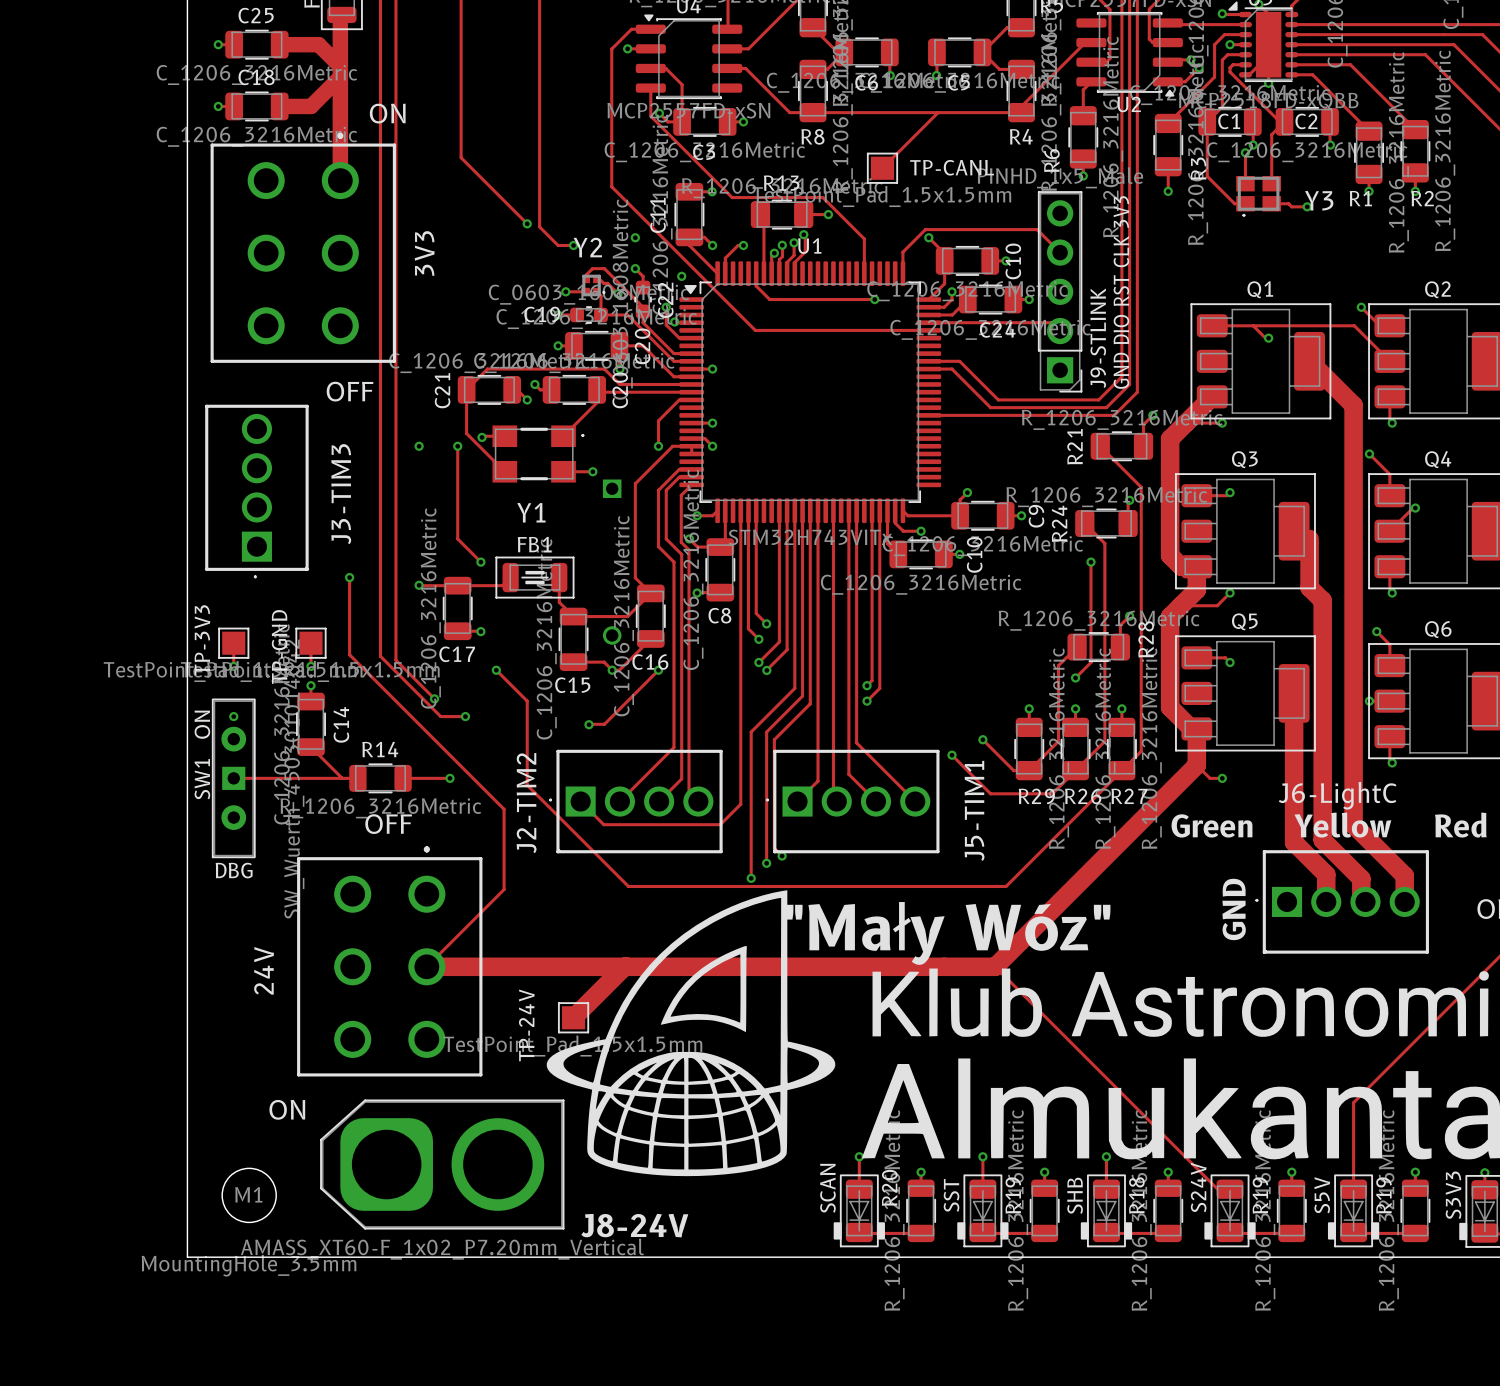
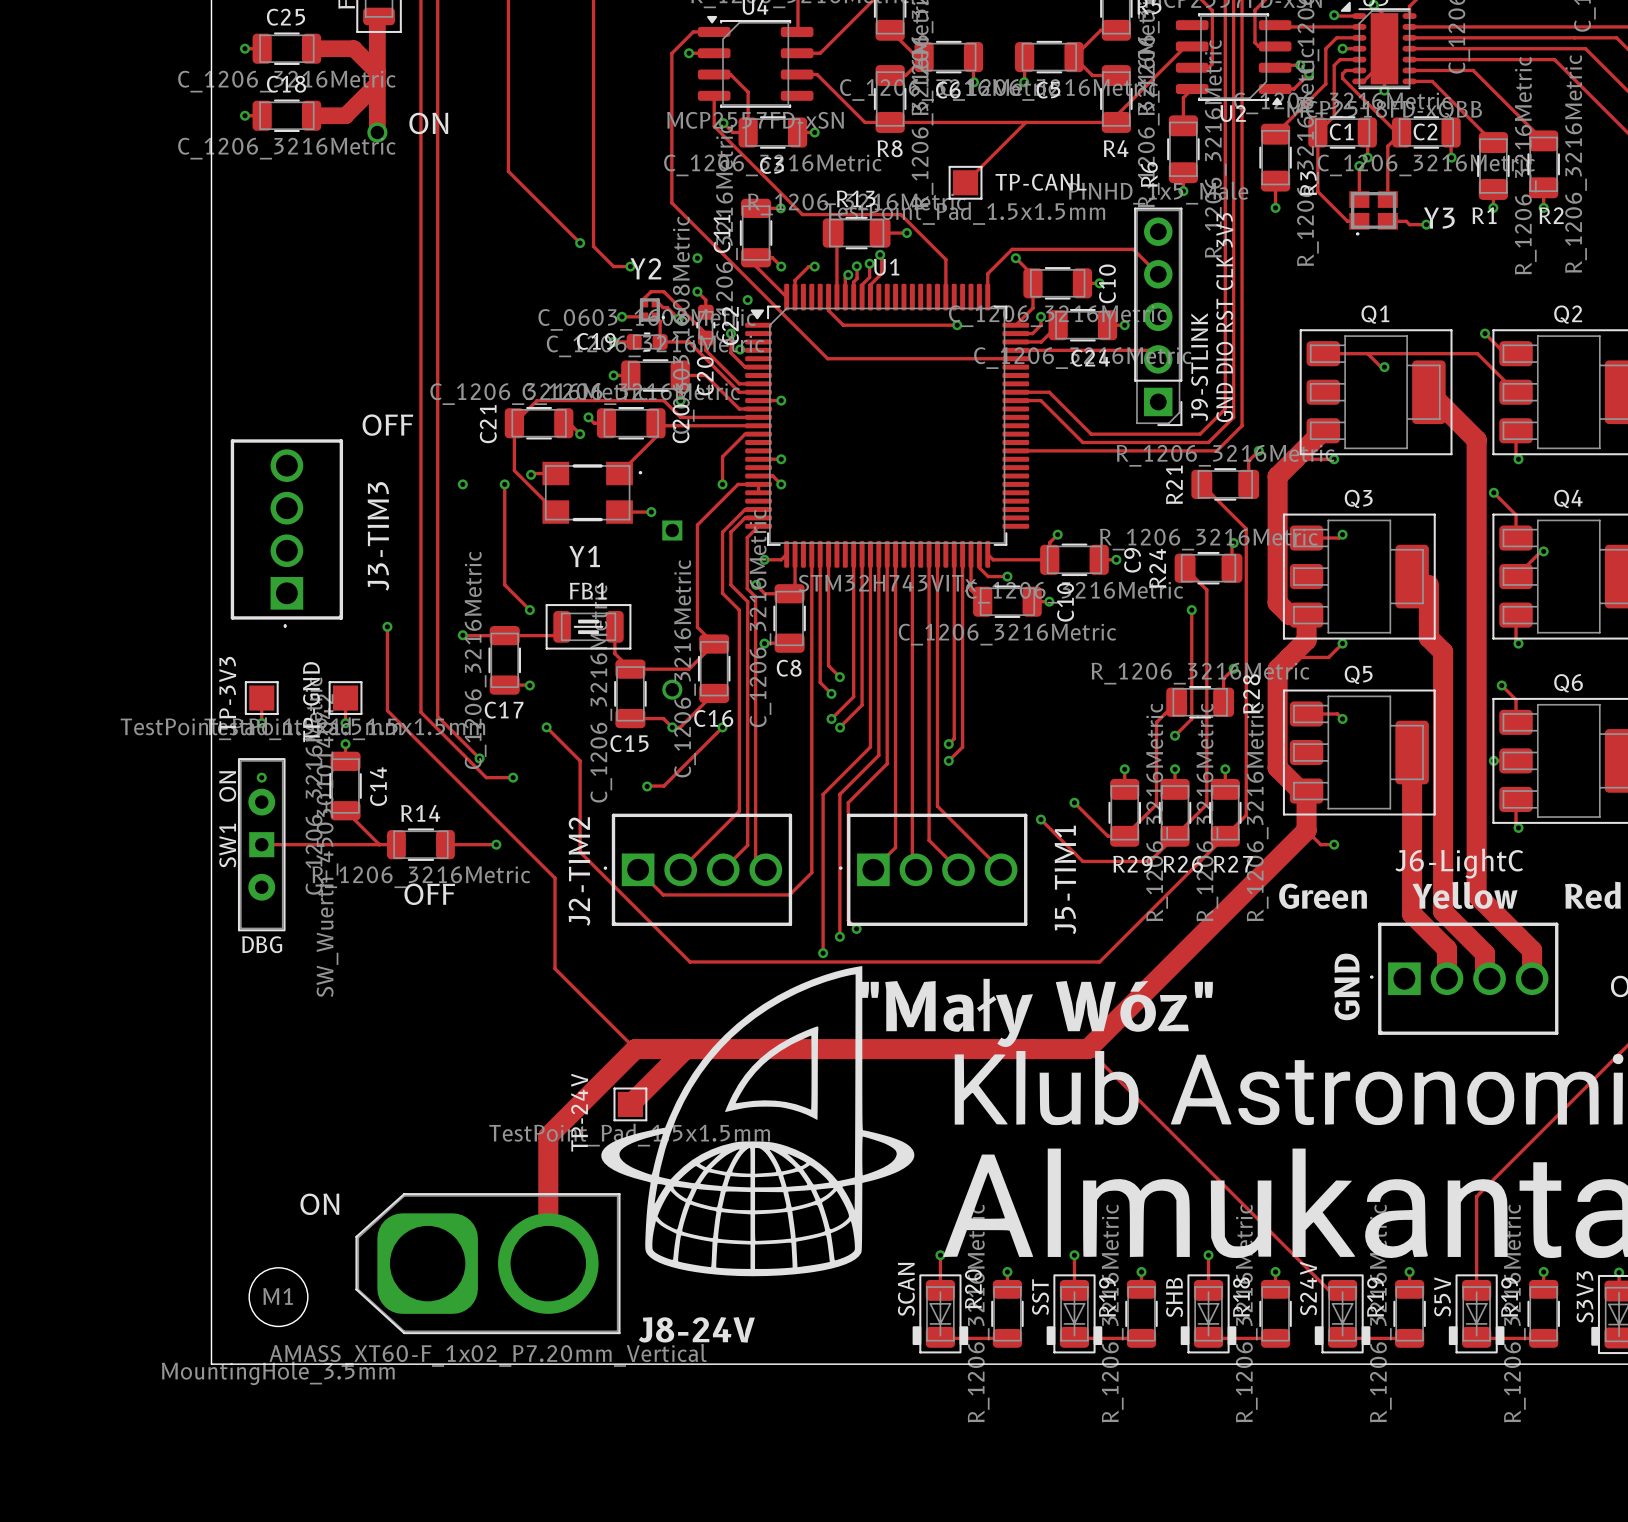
track: (340, 121) (340, 180) -> none
via: none -> (377, 132)
3V3: (303, 247) -> none
track: (504, 889) (426, 966) (578, 966) -> (555, 965) (555, 968) (635, 1049) (548, 1136) (548, 1263)
24V: (389, 961) -> none

